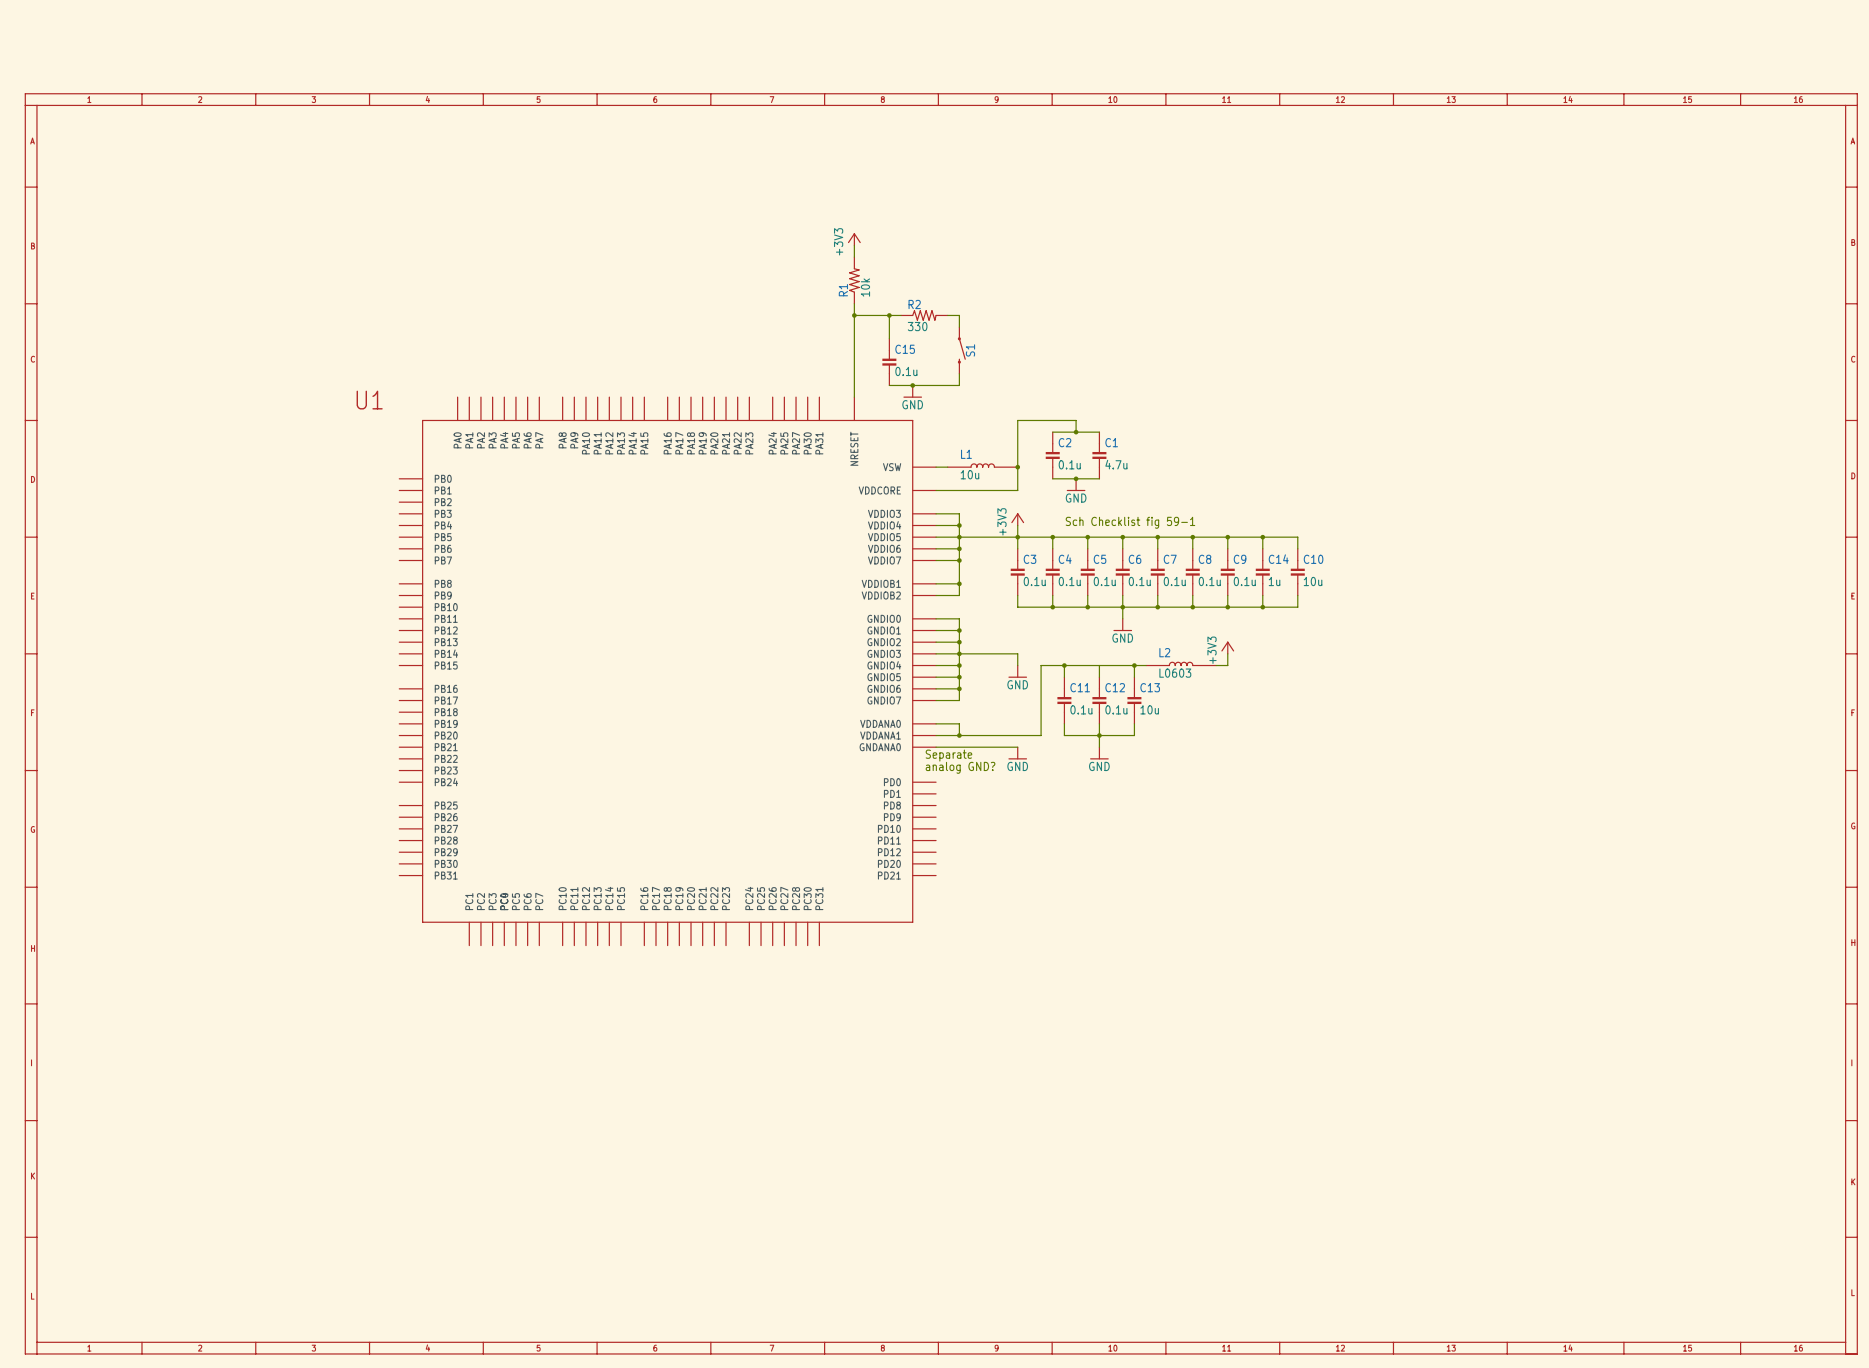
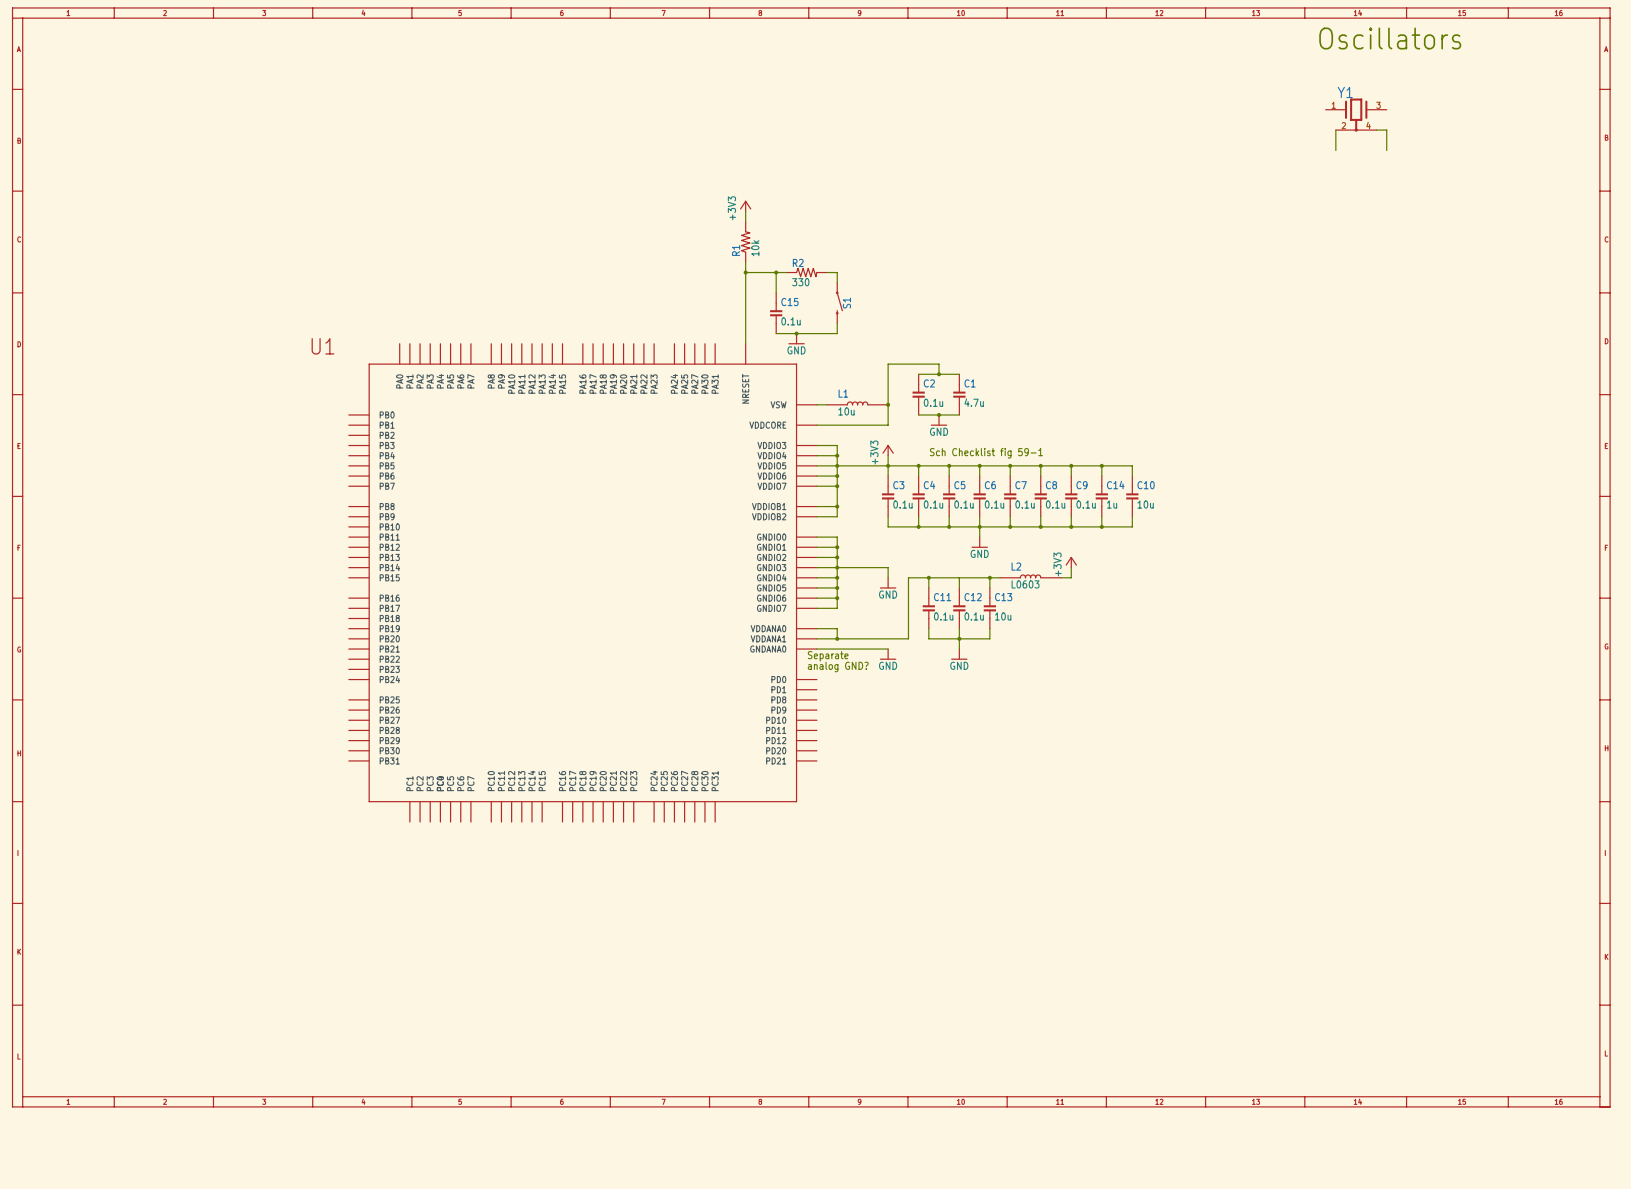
text: none -> Oscillators (1390, 38)
Y1: none -> (1356, 115)
wire: none -> (1335, 130) (1335, 150)
wire: none -> (1376, 130) (1386, 130) (1386, 150)
part position: (941, 723) -> (811, 557)

